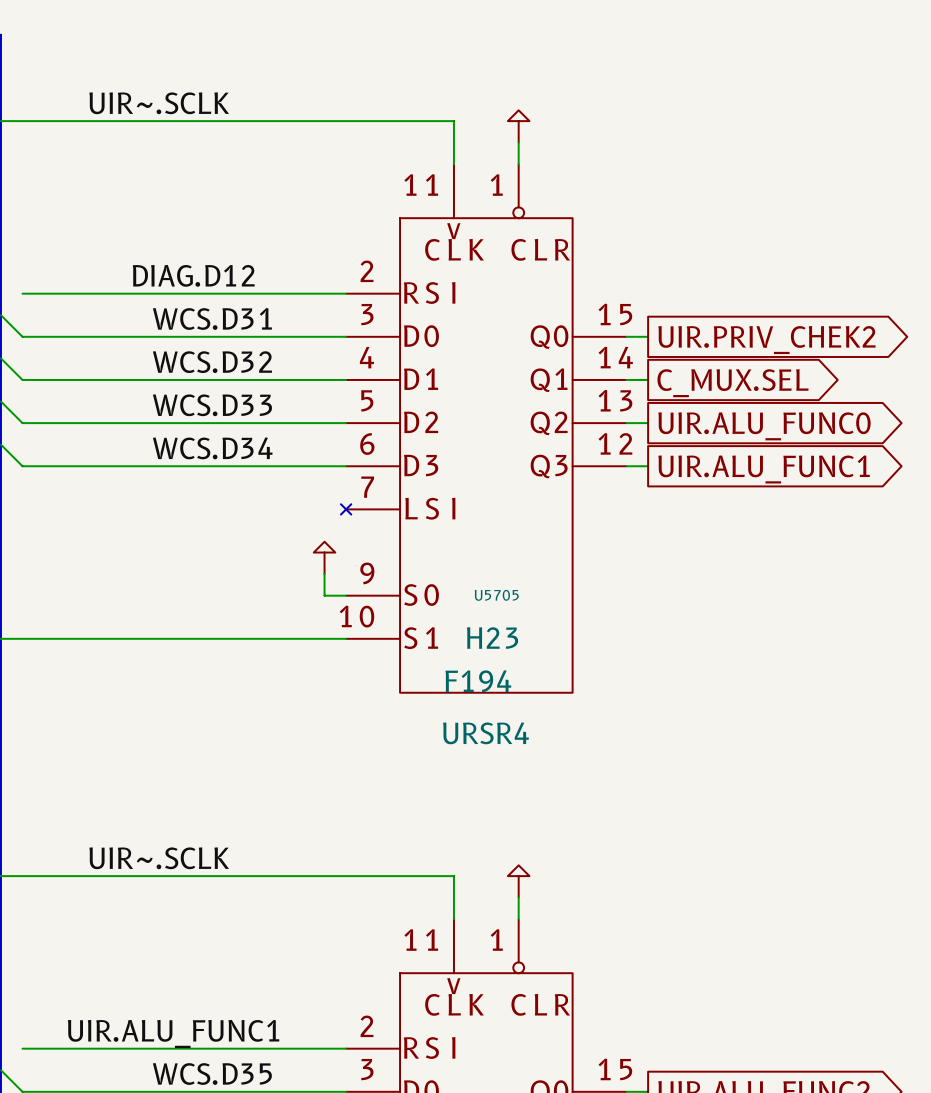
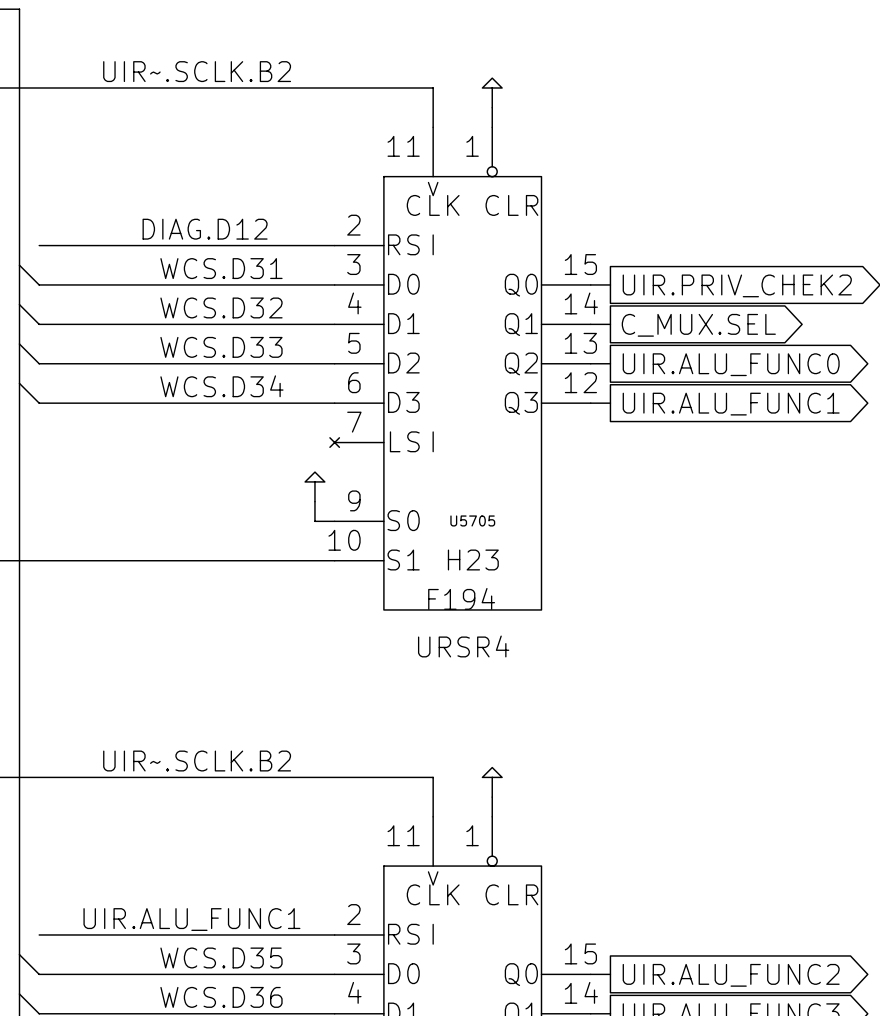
label: UIR~.SCLK (159, 103) -> UIR~.SCLK.B2 (197, 71)
label: UIR~.SCLK (159, 858) -> UIR~.SCLK.B2 (197, 761)

